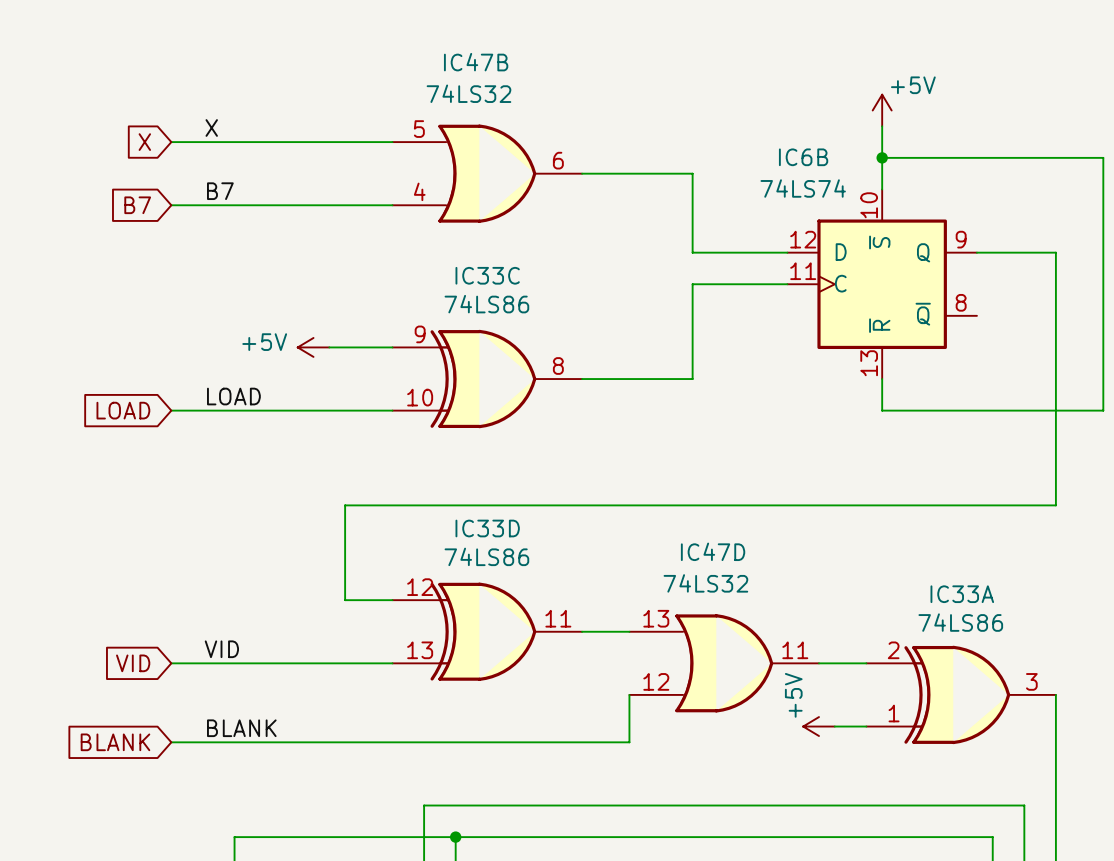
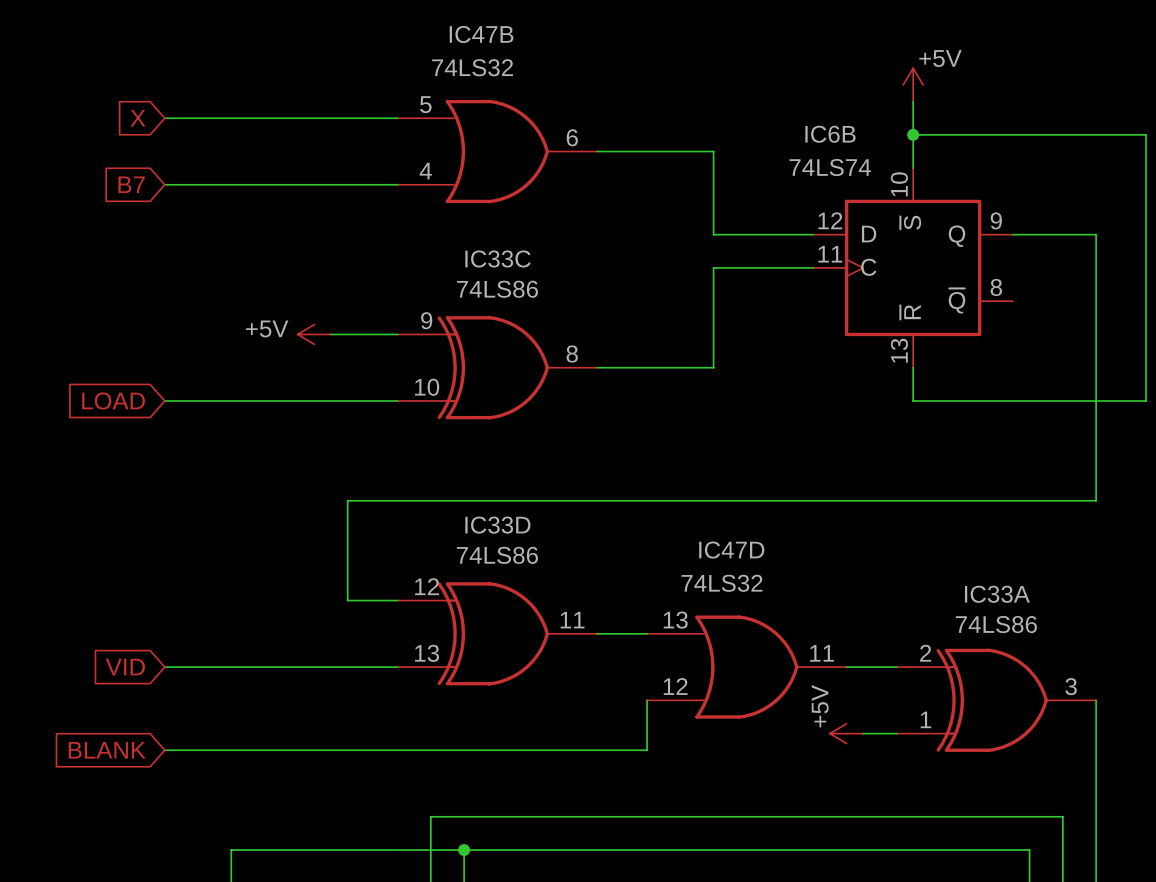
label: X (211, 127) -> none
label: B7 (220, 191) -> none
label: LOAD (233, 396) -> none
label: VID (221, 649) -> none
label: BLANK (241, 728) -> none

